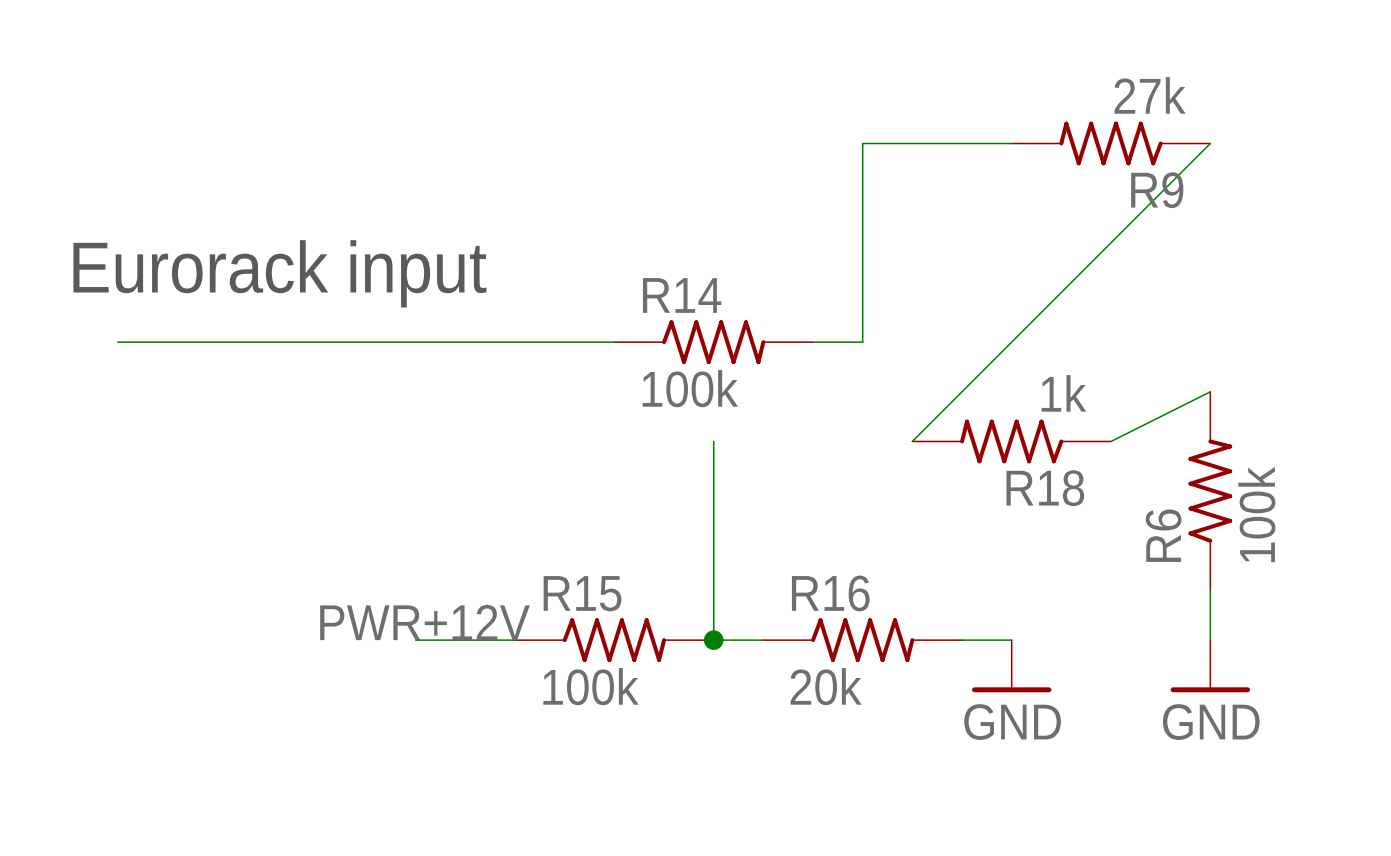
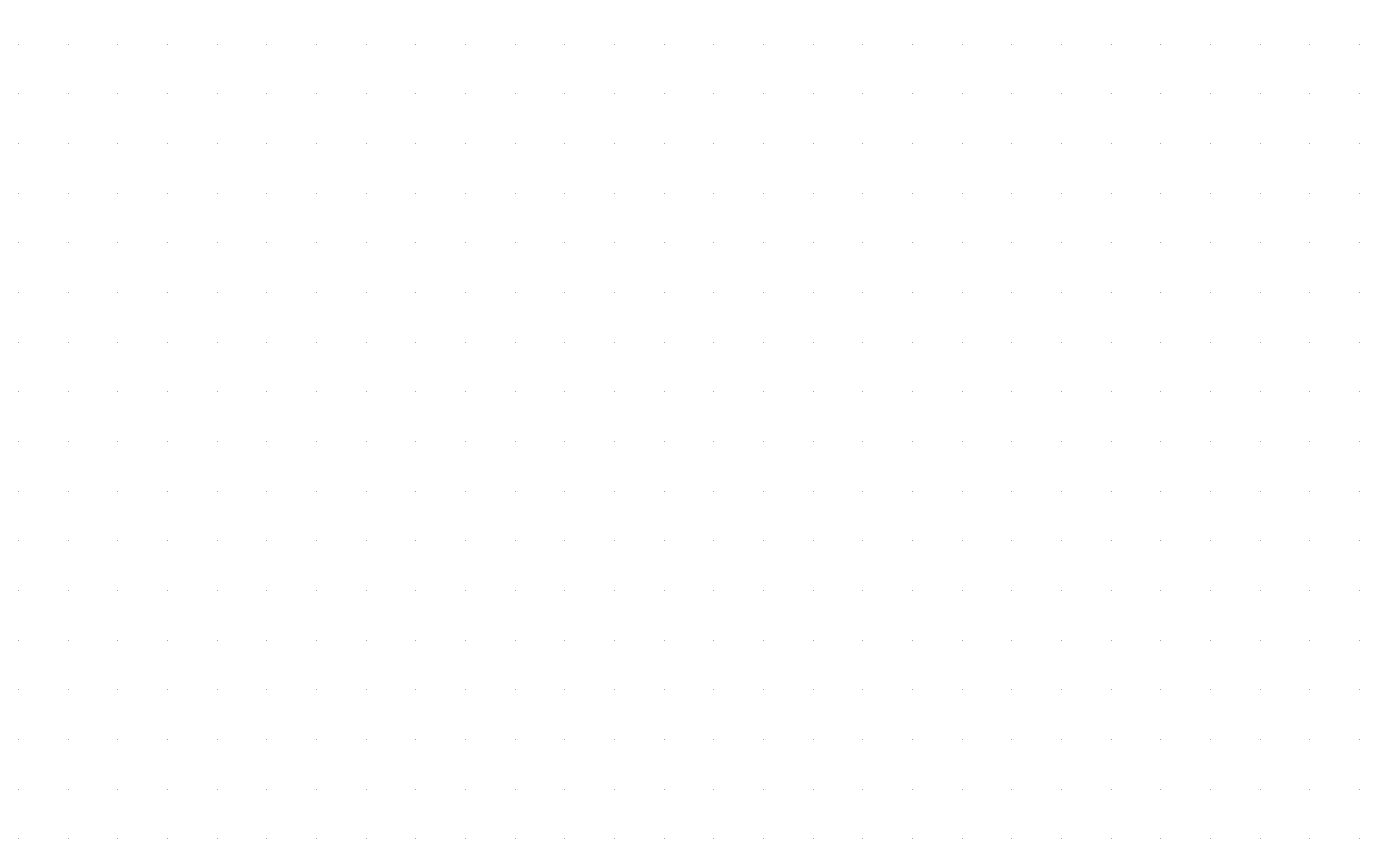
wire: (1011, 143) (862, 143) (862, 342) (813, 342) -> none
R9: 27k (1111, 143) -> none
wire: (1210, 143) (912, 441) -> none
text: Eurorack input (279, 273) -> none
wire: (117, 342) (614, 342) -> none
R14: 100k (713, 342) -> none
wire: (1210, 391) (1111, 441) -> none
wire: (713, 441) (713, 640) (763, 640) -> none
R18: 1k (1011, 441) -> none
R6: 100k (1210, 491) -> none
wire: (1210, 590) (1210, 640) -> none
label: PWR+12V (424, 622) -> none
wire: (415, 640) (515, 640) -> none
R15: 100k (614, 640) -> none
junction: (713, 640) -> none
R16: 20k (862, 640) -> none
wire: (962, 640) (1011, 640) -> none
power symbol: GND (1011, 666) -> none
power symbol: GND (1210, 666) -> none

